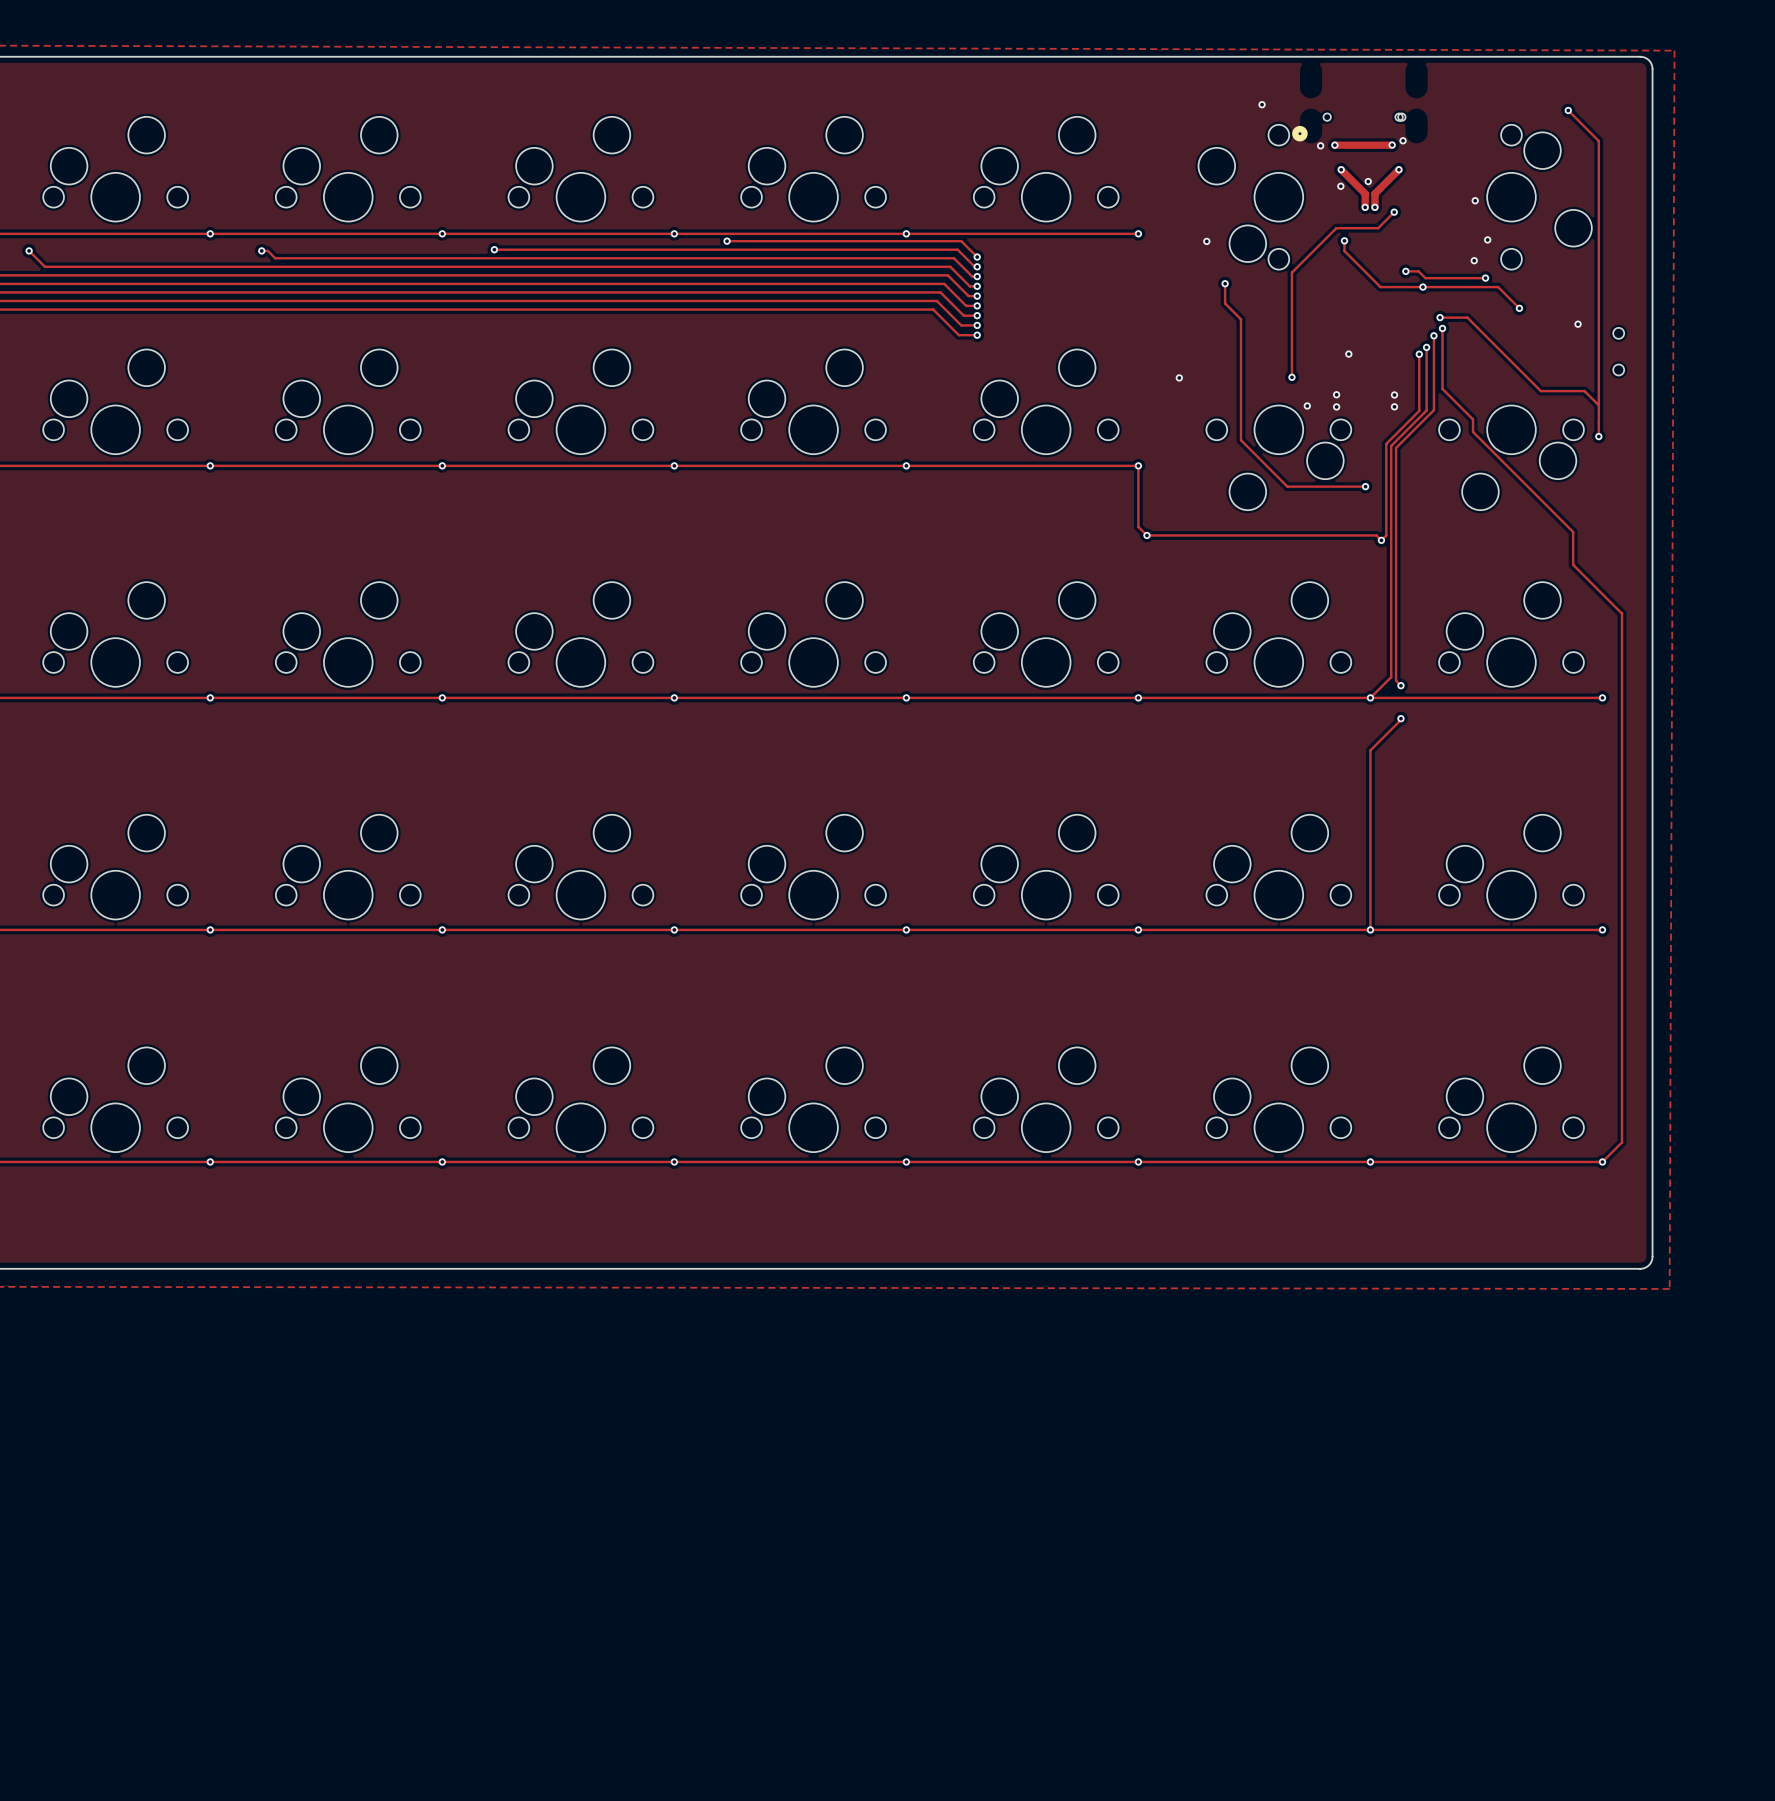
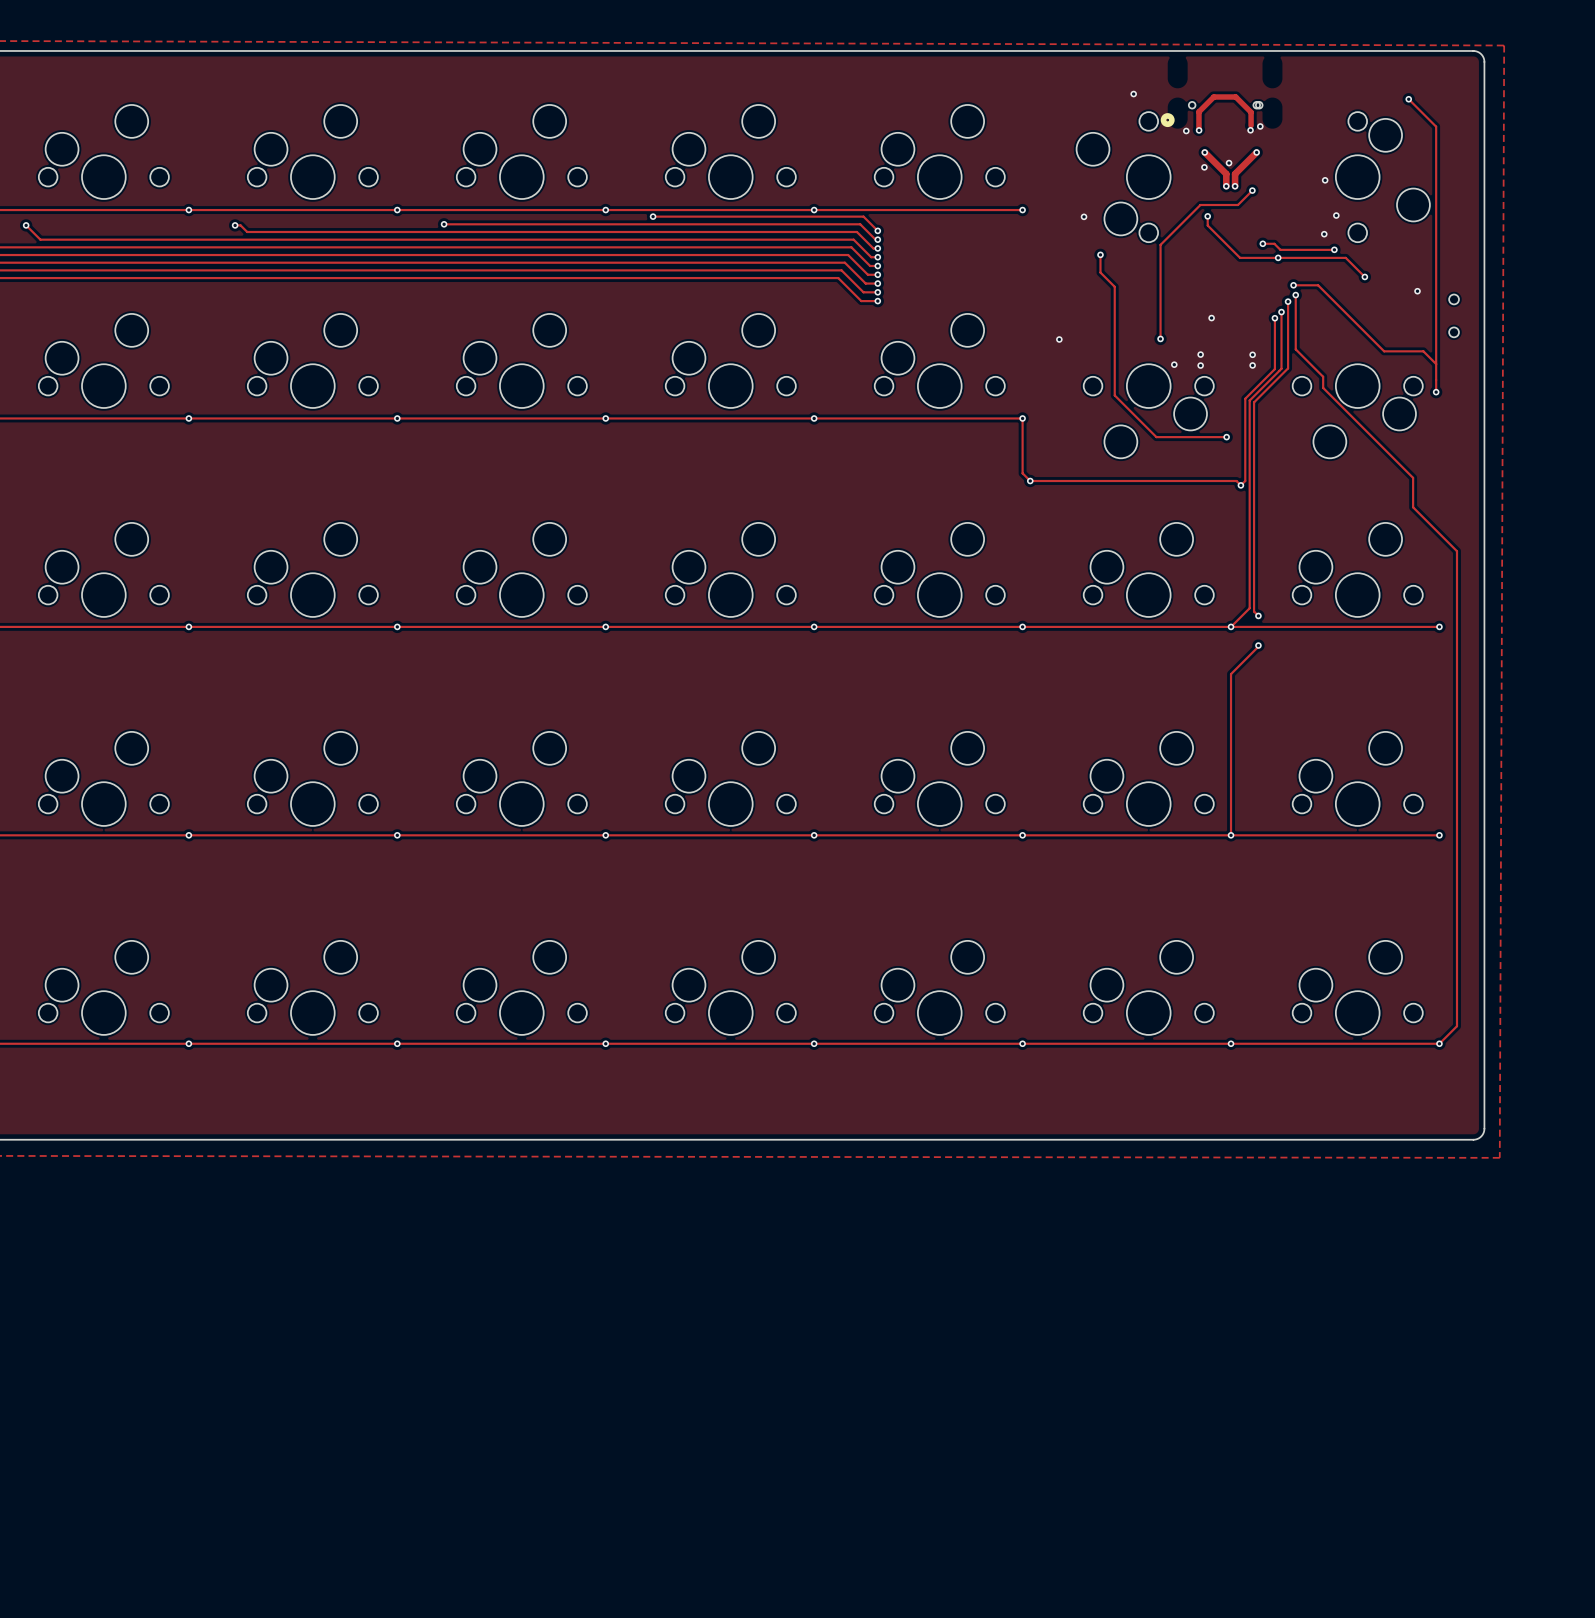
track: none -> (1251, 125) (1251, 112) (1235, 97) (1213, 97) (1198, 111) (1198, 129)
track: (1334, 145) (1392, 145) -> none

